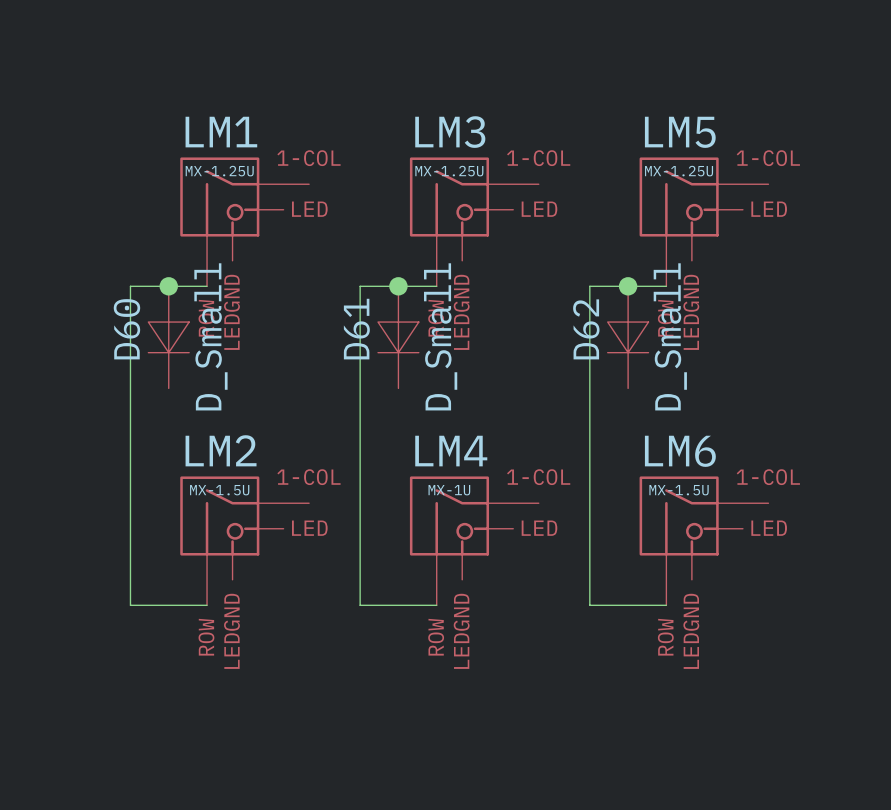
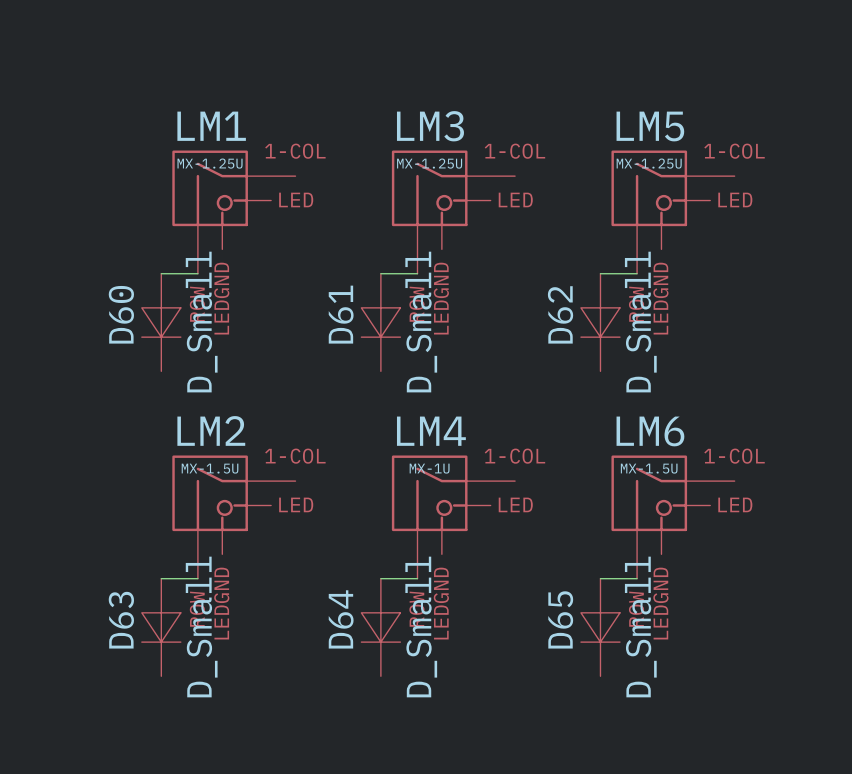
wire: (168, 286) (130, 286) (130, 605) (168, 605) -> none
junction: (168, 286) -> none
wire: (398, 286) (360, 286) (360, 605) (398, 605) -> none
junction: (398, 286) -> none
wire: (628, 286) (589, 286) (589, 605) (628, 605) -> none
junction: (628, 286) -> none
D63: none -> D_Small (161, 627)
D64: none -> D_Small (380, 627)
D65: none -> D_Small (600, 627)

